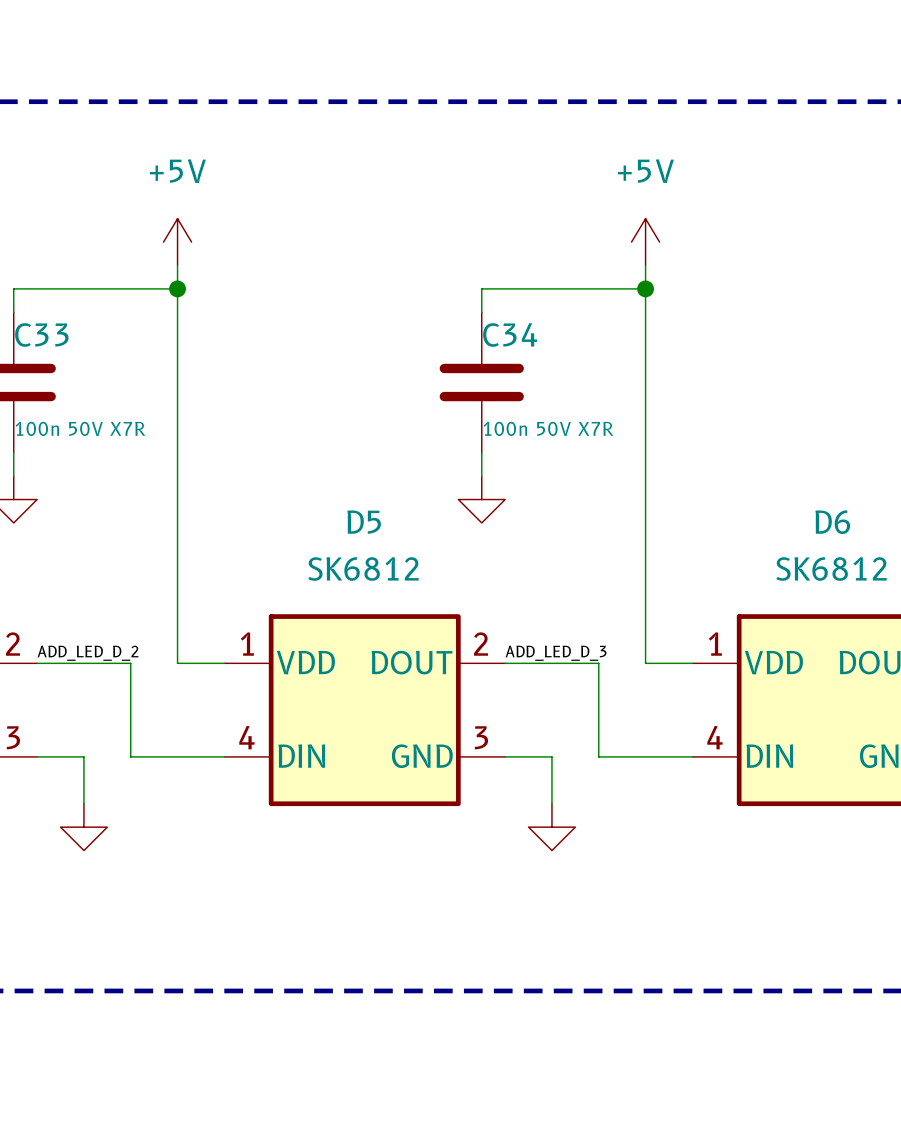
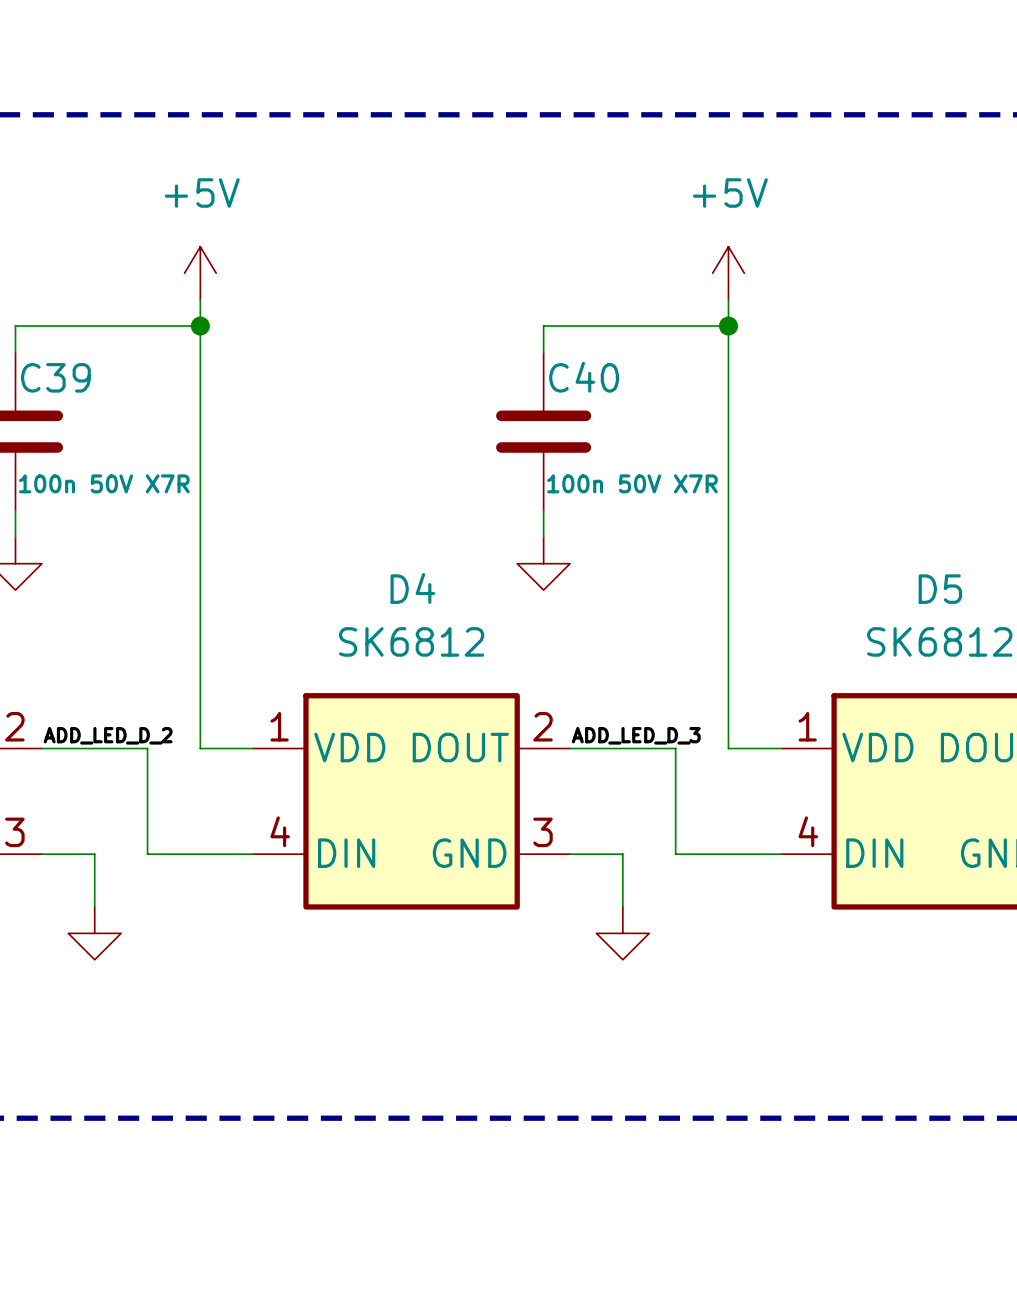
C34 name: C34 (510, 334) -> C40 (584, 377)
C33 name: C33 (41, 335) -> C39 (55, 377)
D5 name: D5 (364, 522) -> D4 (412, 588)
D6 name: D6 (832, 522) -> D5 (940, 589)

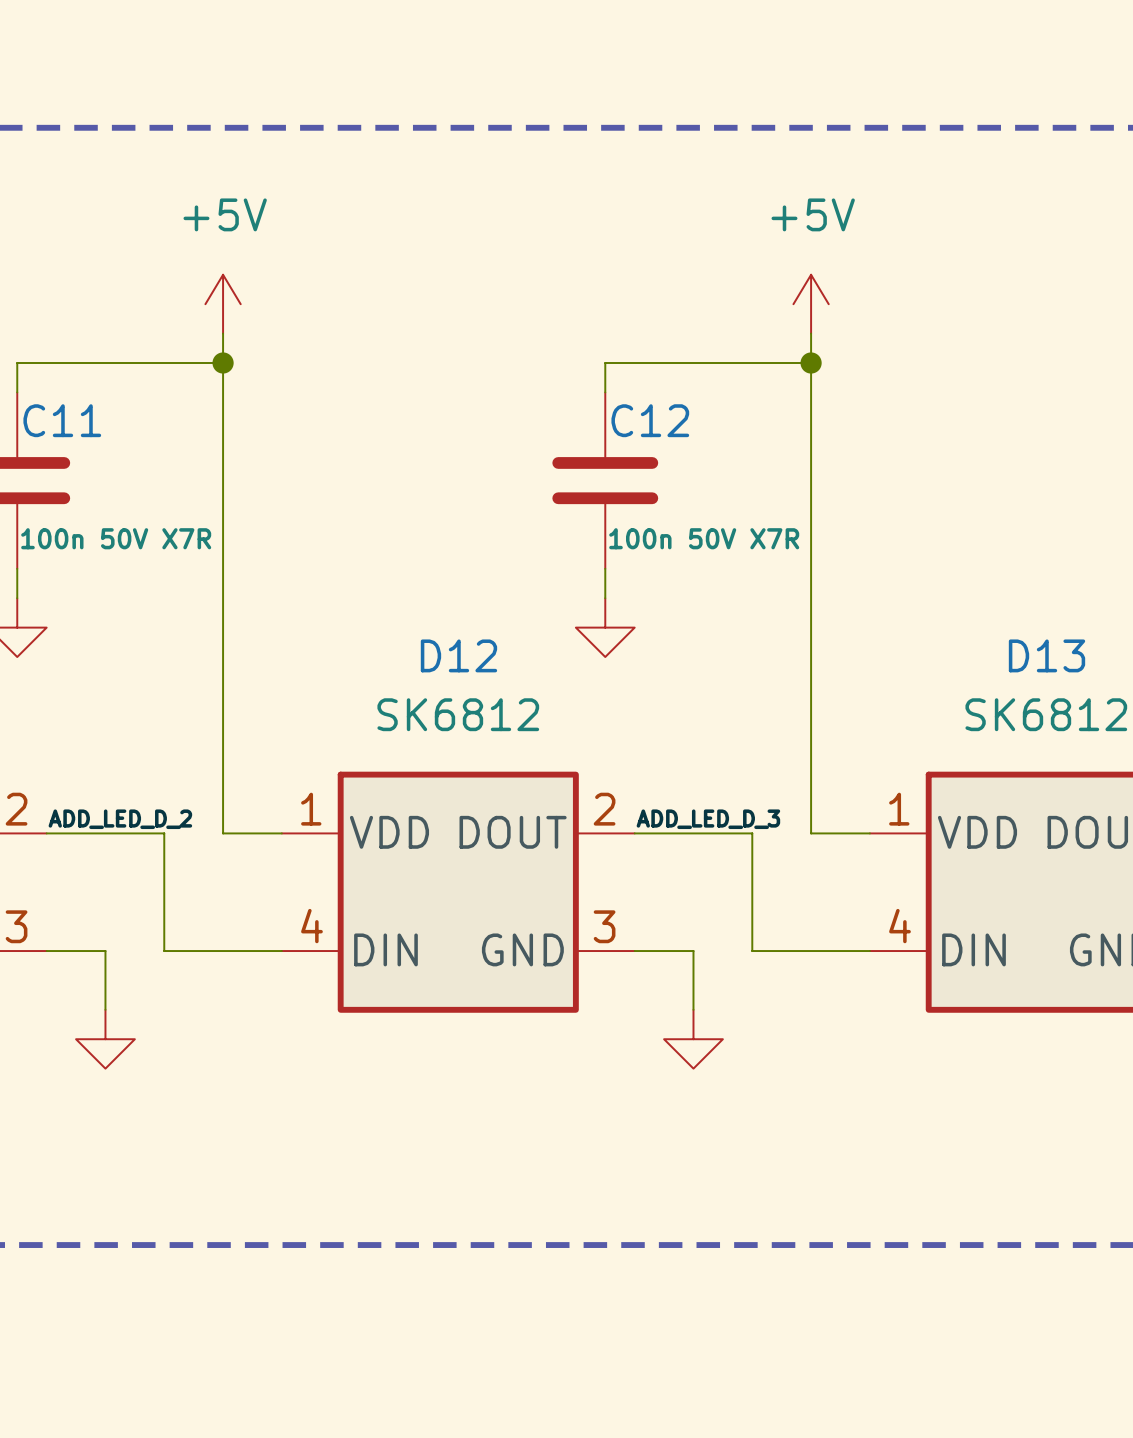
C39 name: C39 (55, 377) -> C11 (62, 420)
C40 name: C40 (584, 377) -> C12 (650, 420)
D4 name: D4 (412, 588) -> D12 (458, 655)
D5 name: D5 (940, 589) -> D13 (1047, 655)

